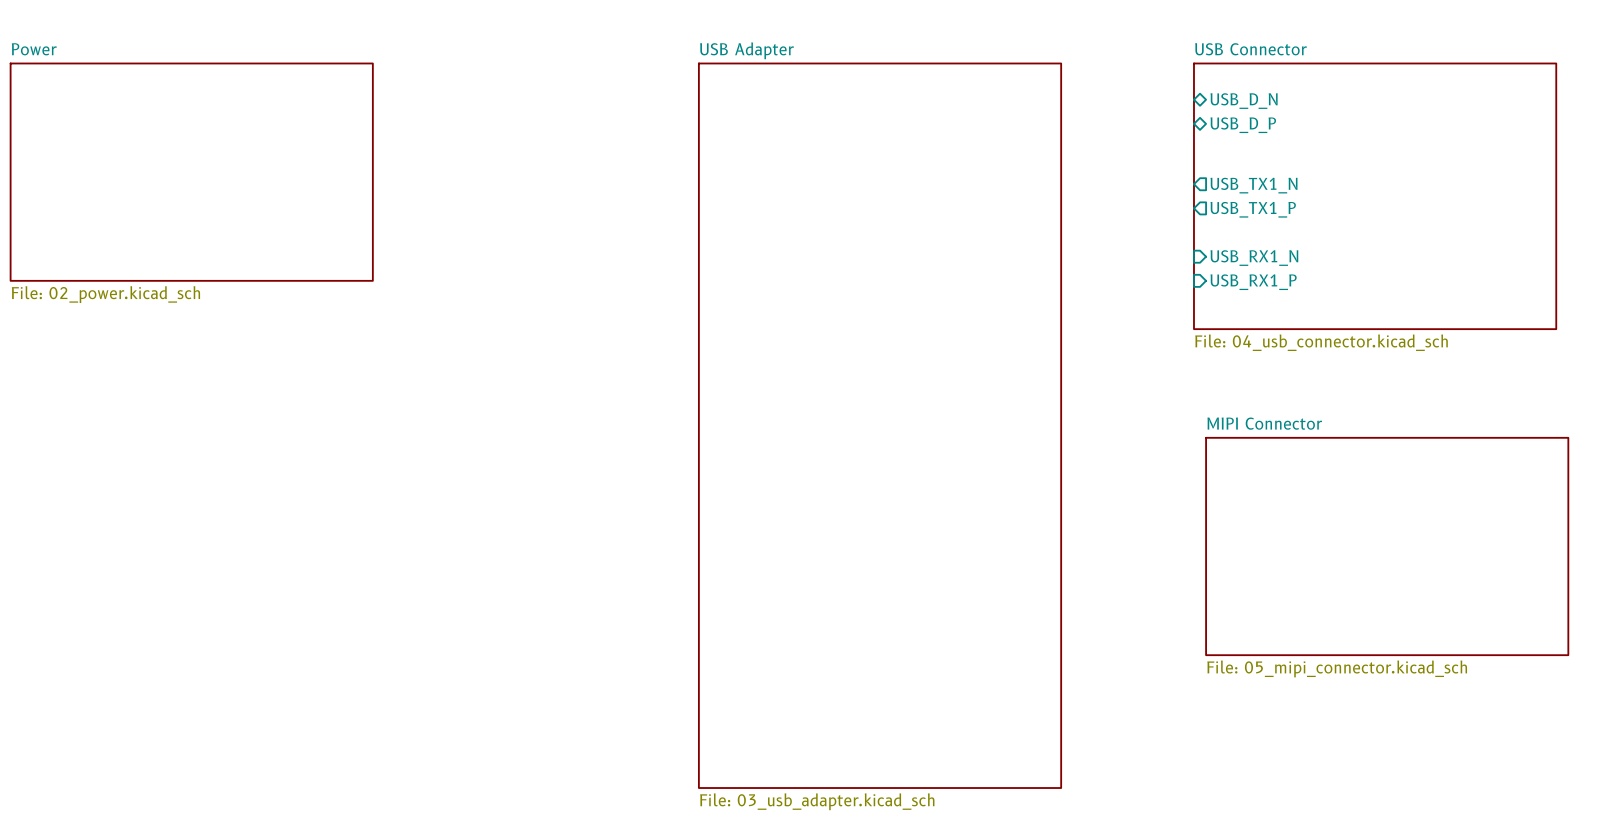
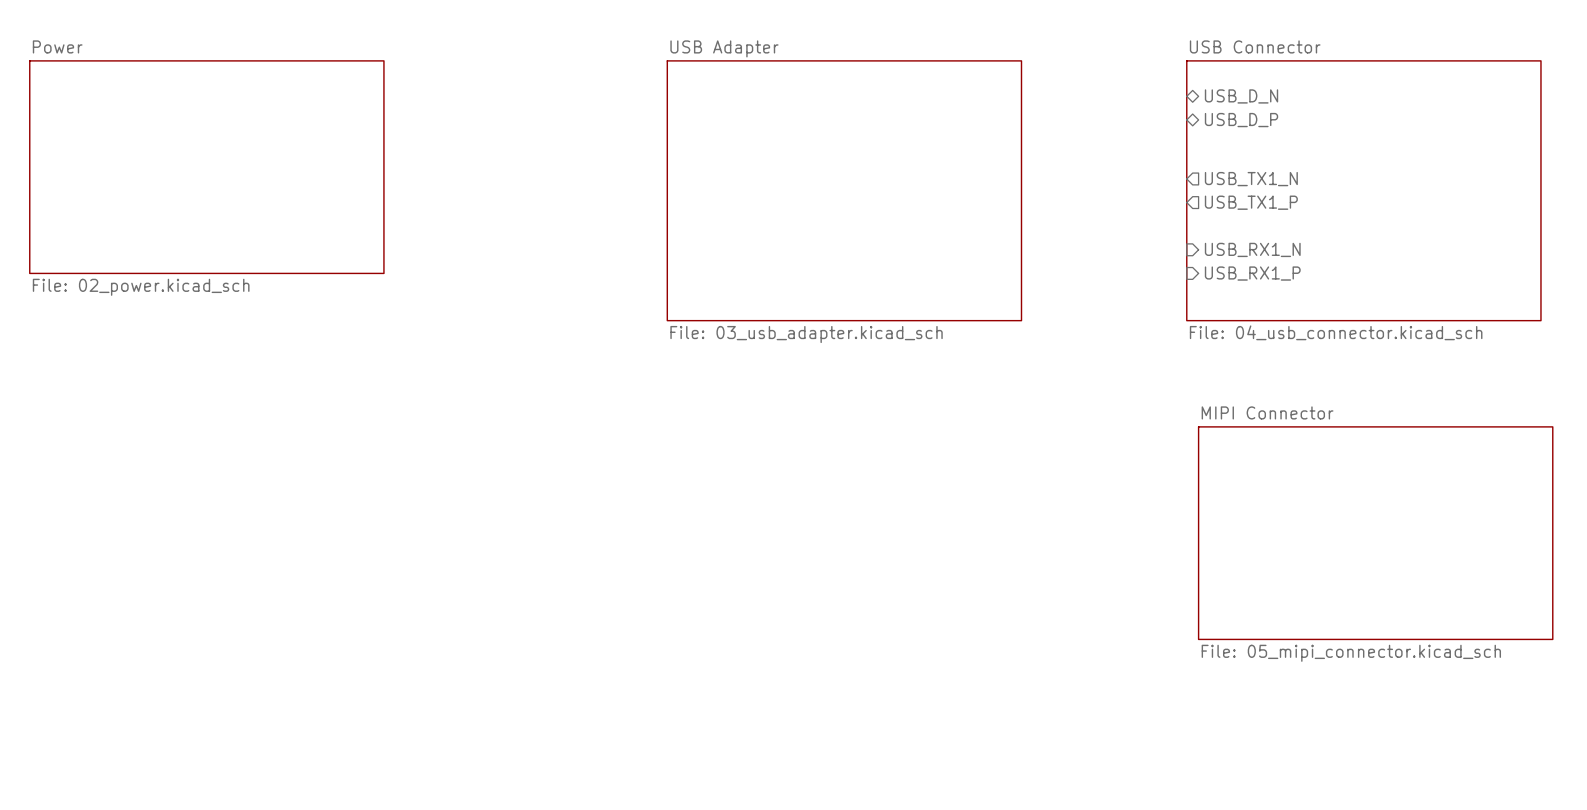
sheet USB Adapter: none -> File: 03_usb_adapter.kicad_sch (844, 190)
sheet USB Adapter: File: 03_usb_adapter.kicad_sch (880, 425) -> none

